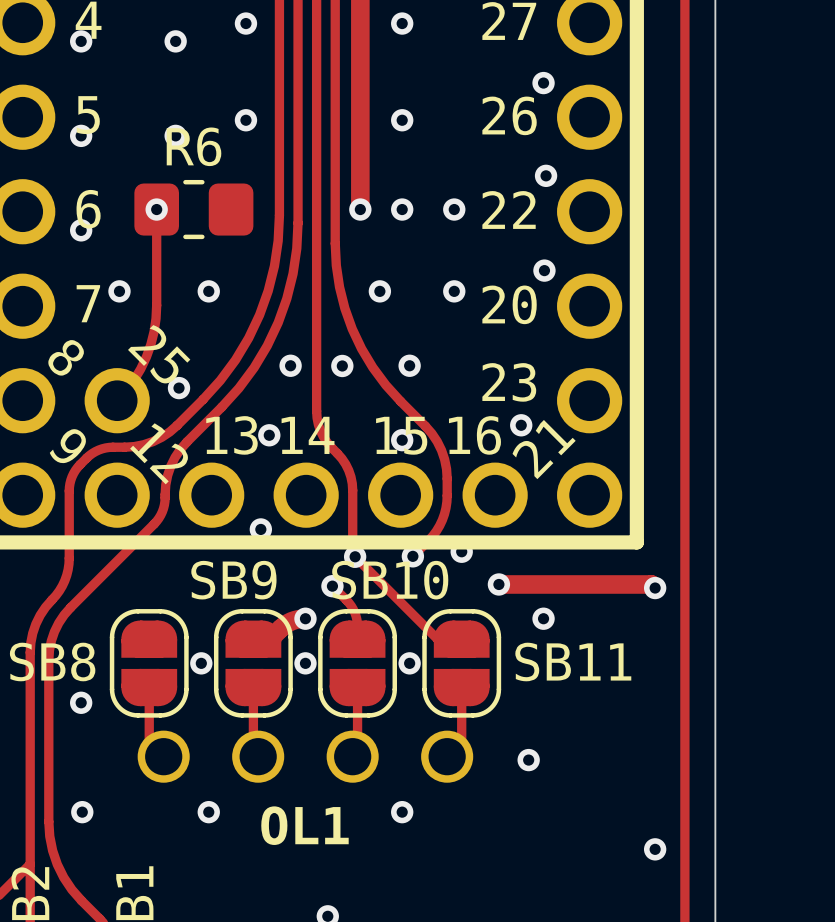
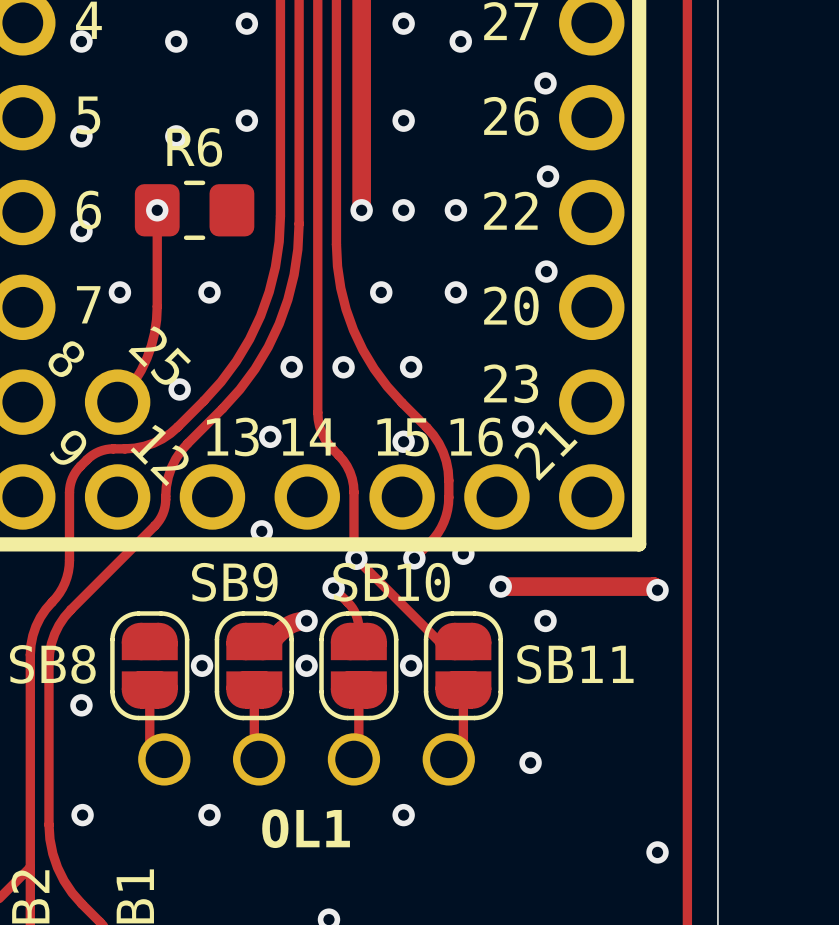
via: none -> (460, 41)

